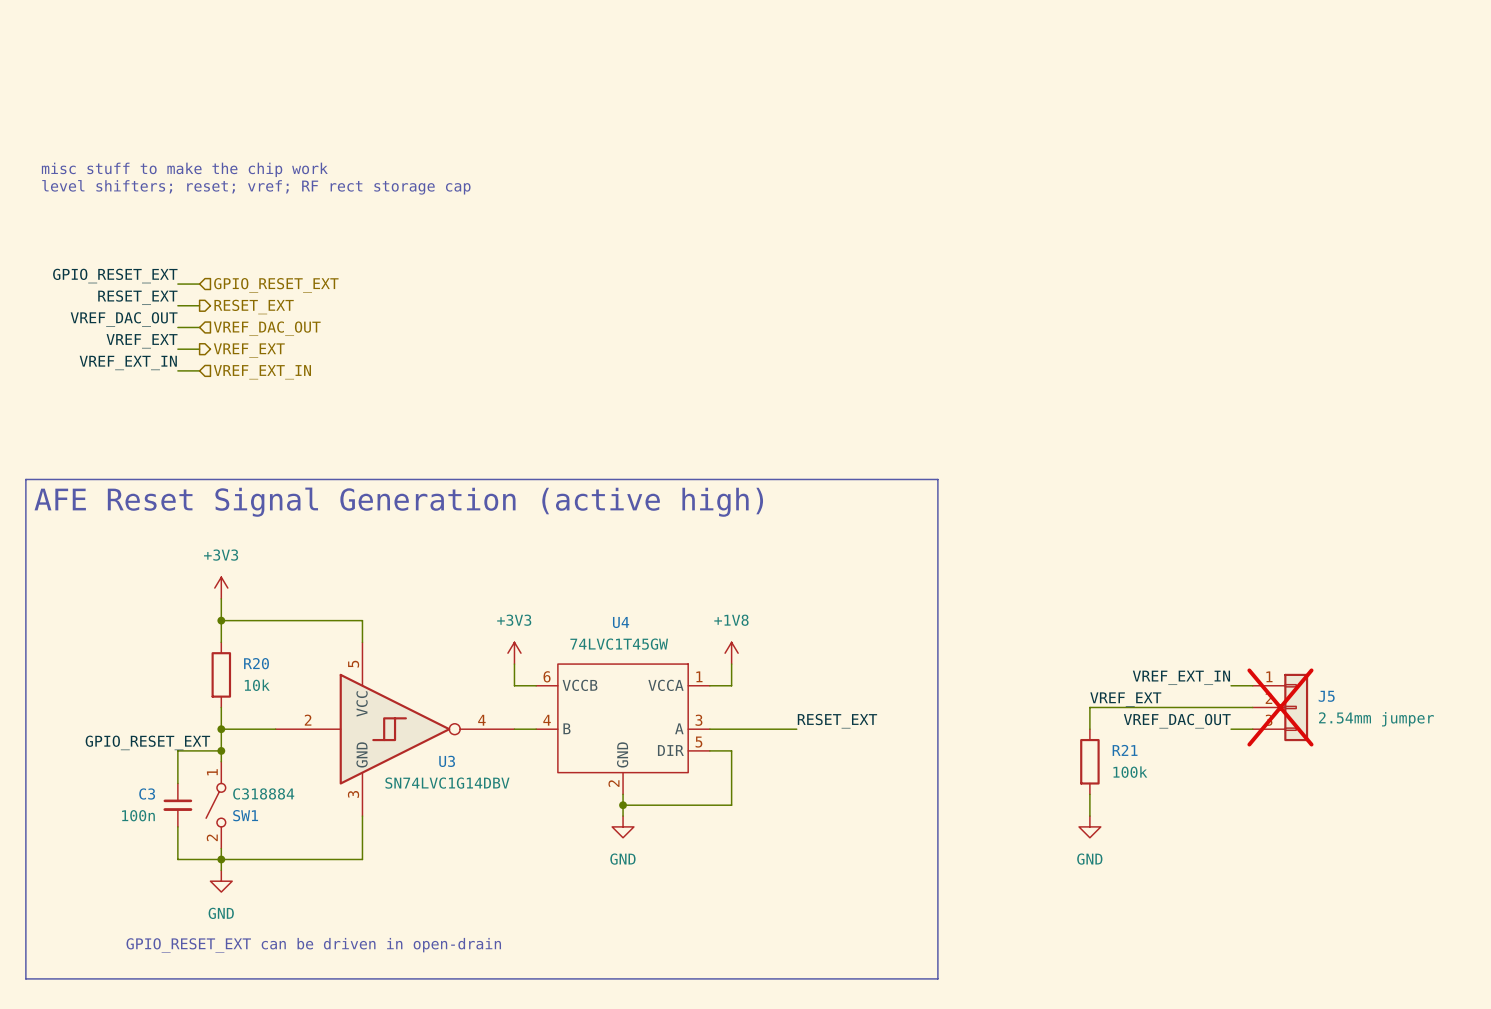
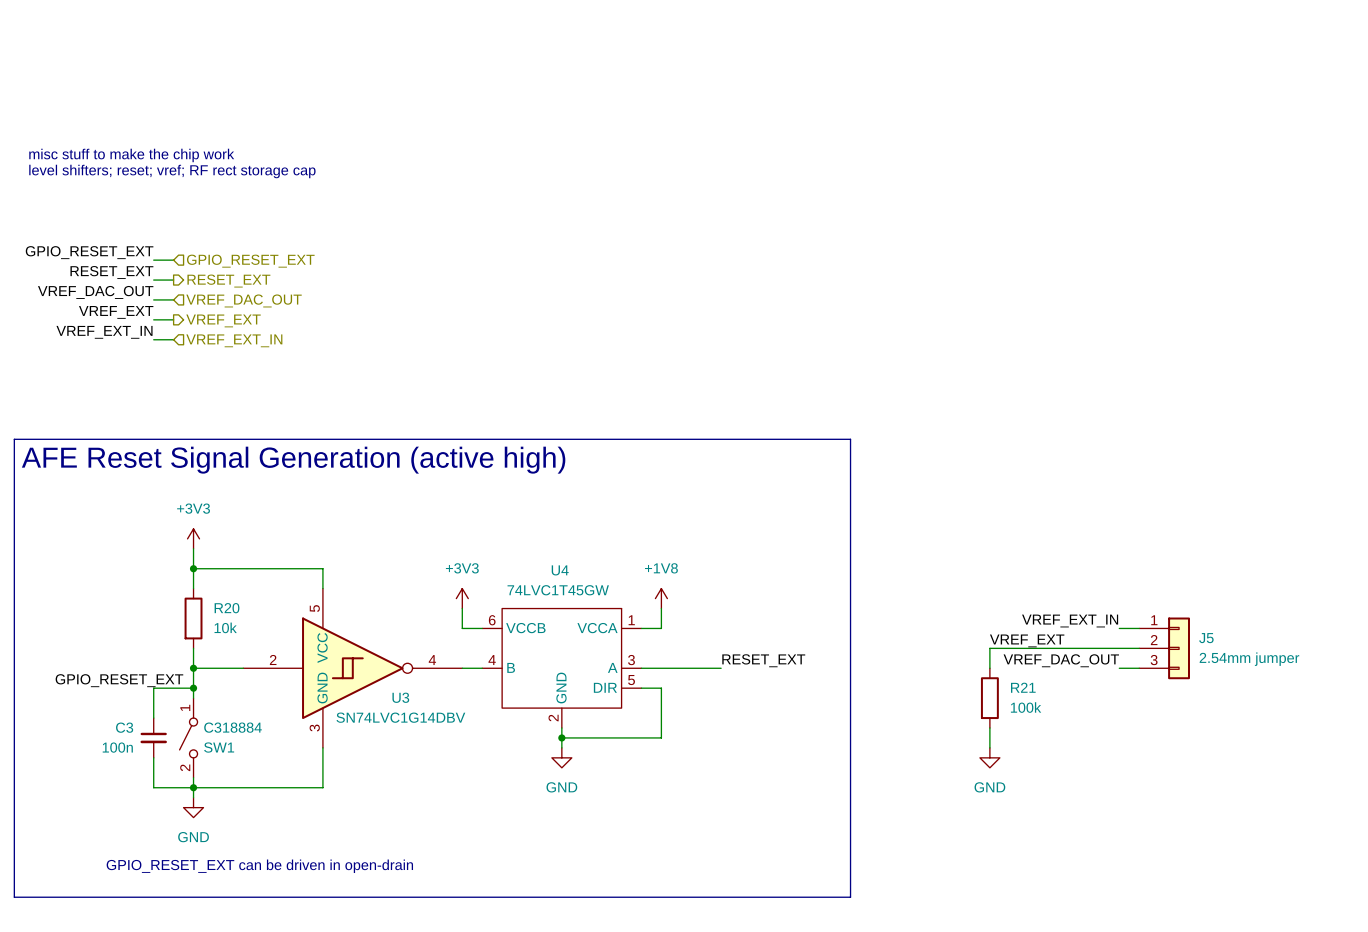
J5 do-not-place cross: (1280, 707) -> none

